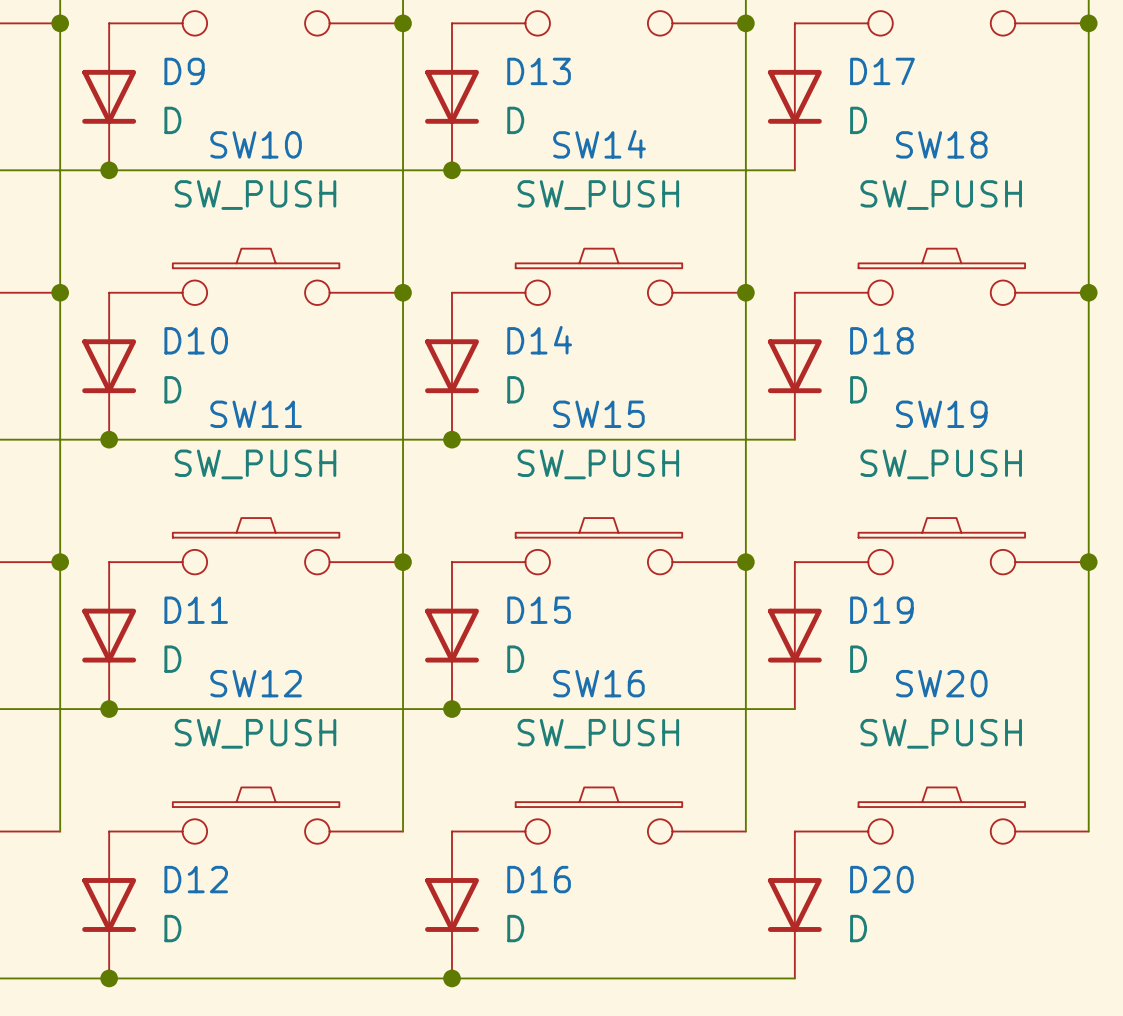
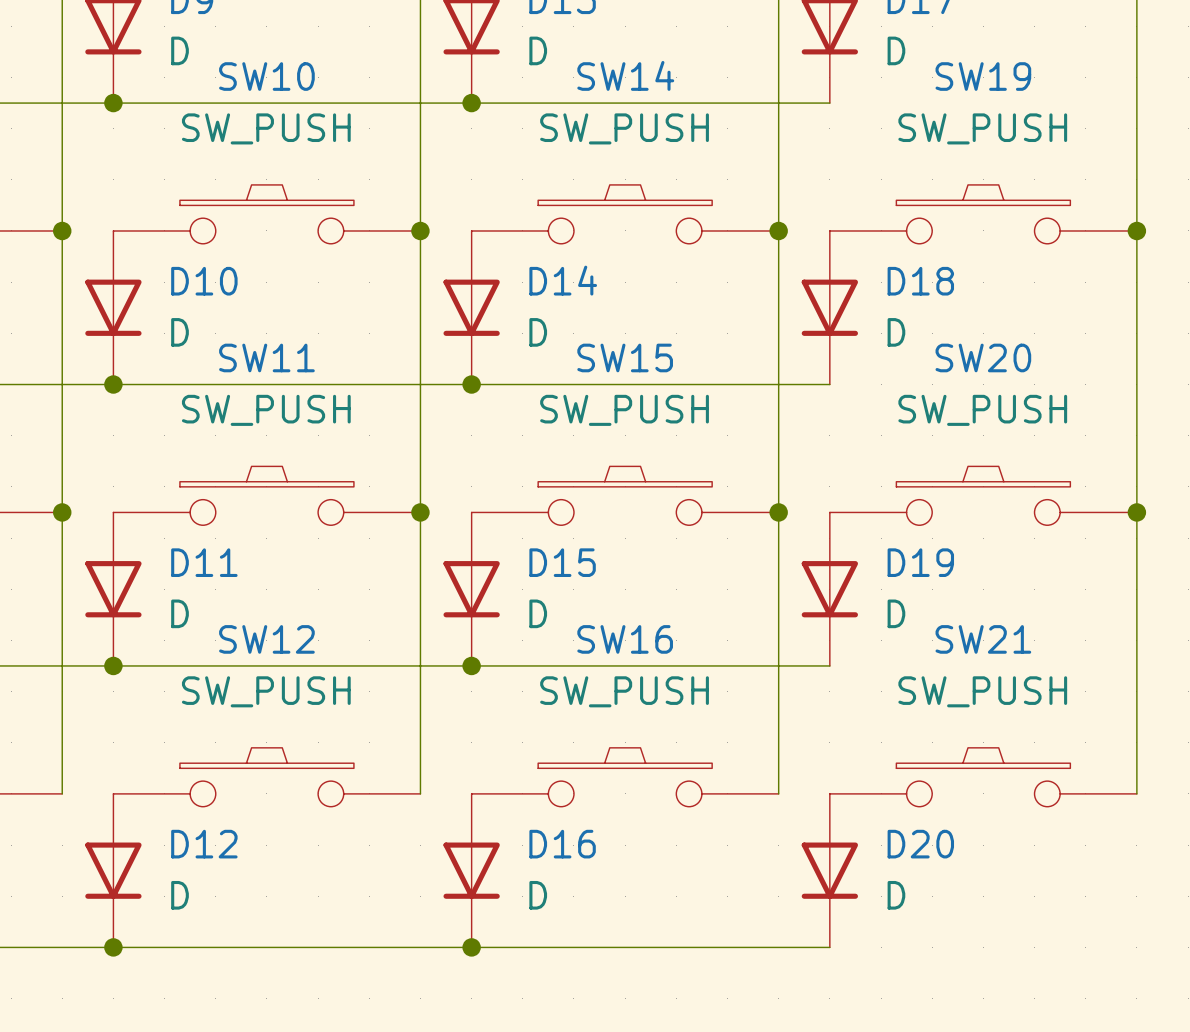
SW18 name: SW18 (941, 144) -> SW19 (983, 76)
SW19 name: SW19 (941, 414) -> SW20 (983, 357)
SW20 name: SW20 (941, 683) -> SW21 (983, 639)

